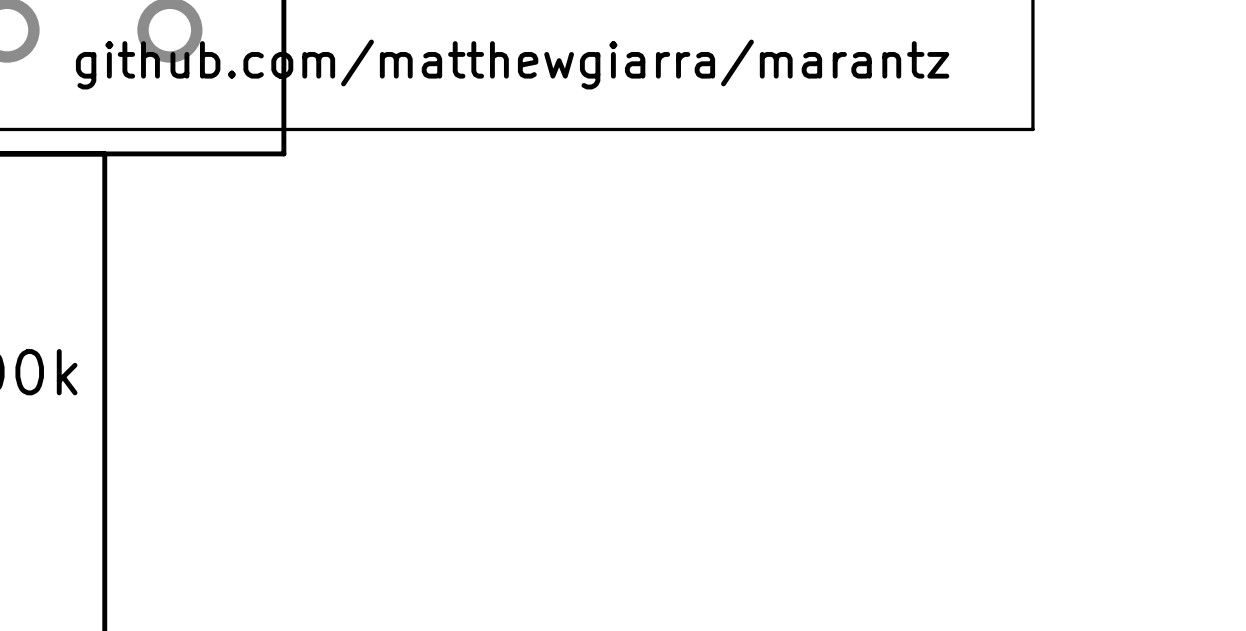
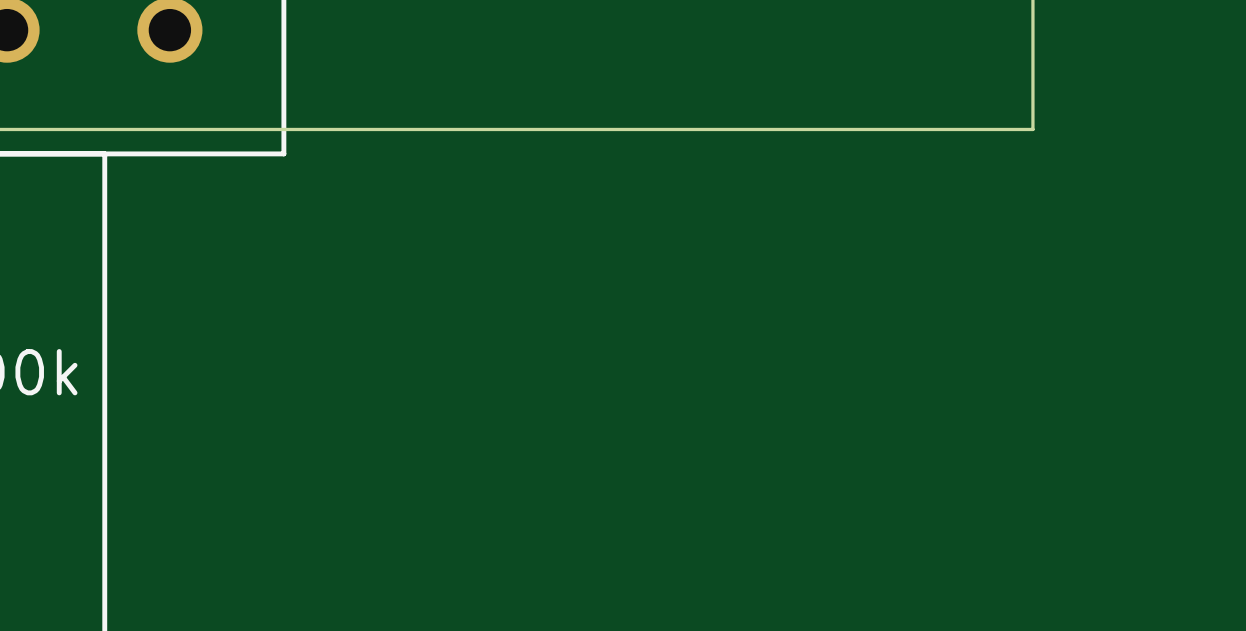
text: github.com/matthewgiarra/marantz (512, 64) -> none

